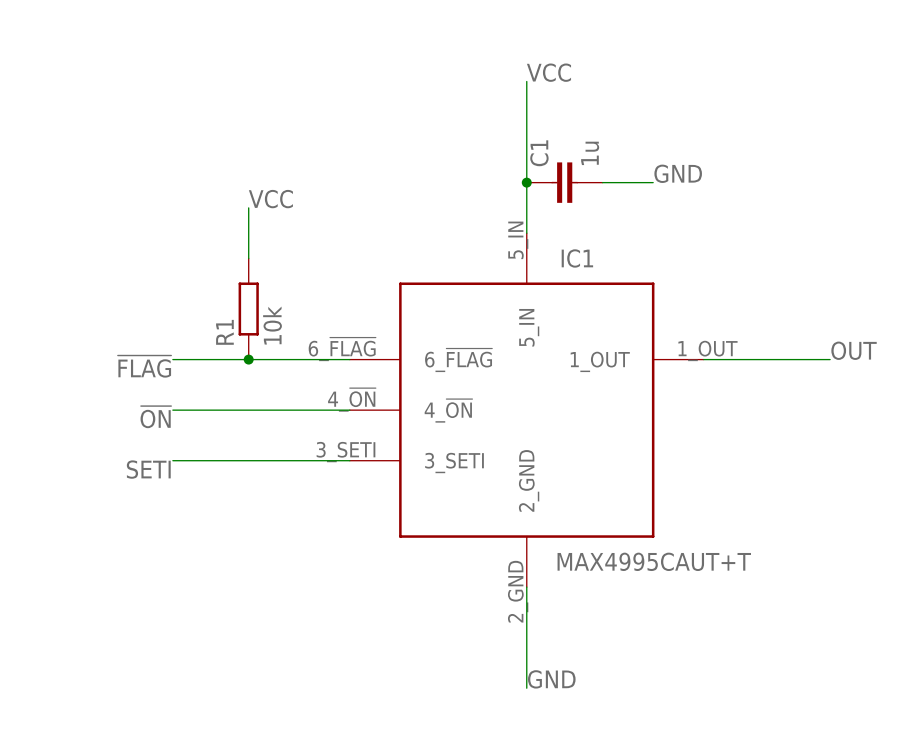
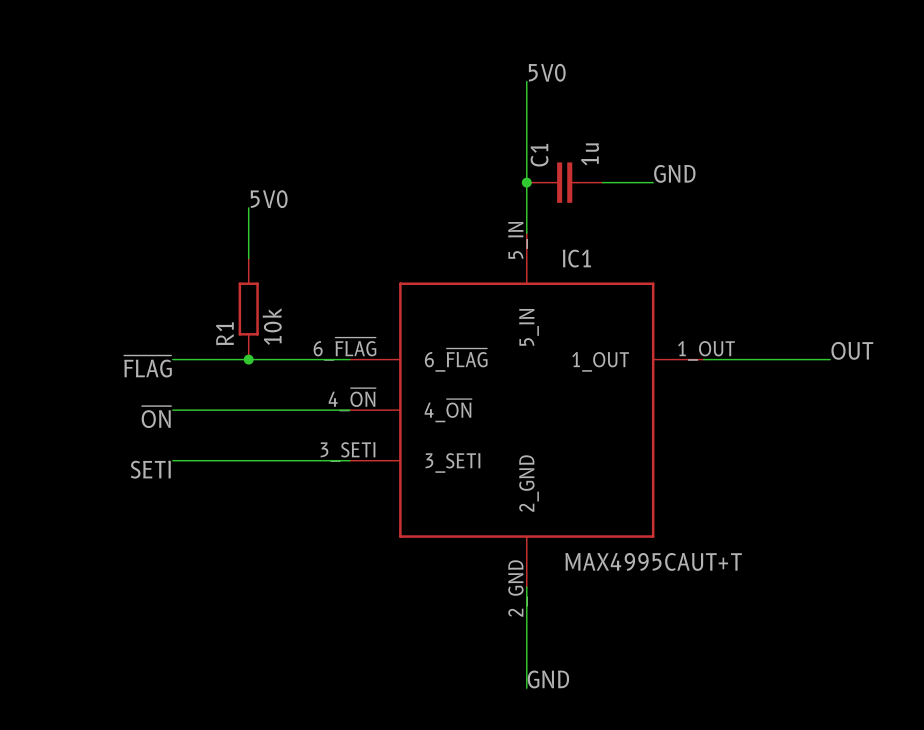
label: VCC (548, 72) -> 5V0 (547, 72)
label: VCC (270, 199) -> 5V0 (269, 199)

